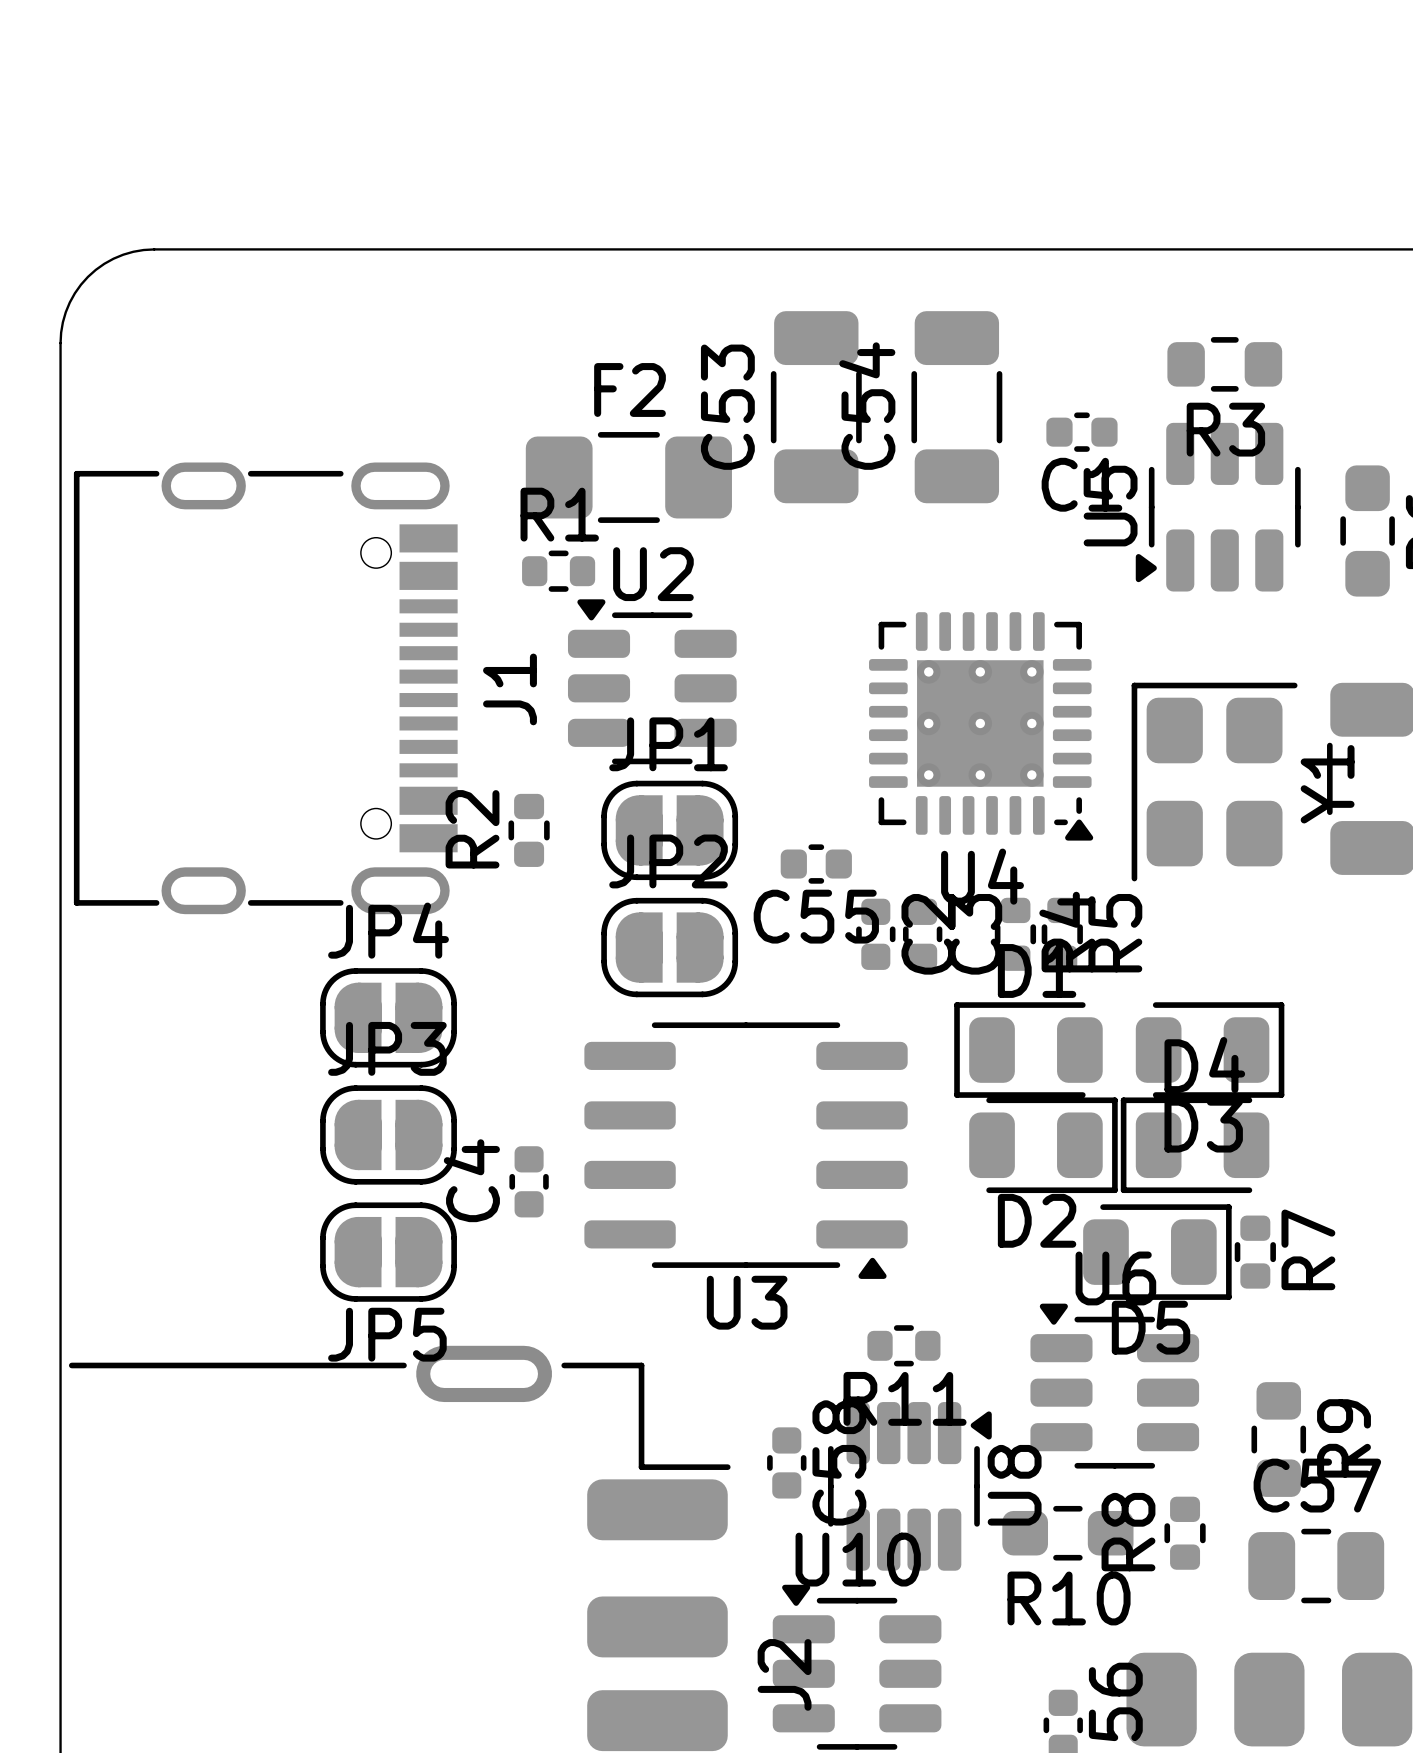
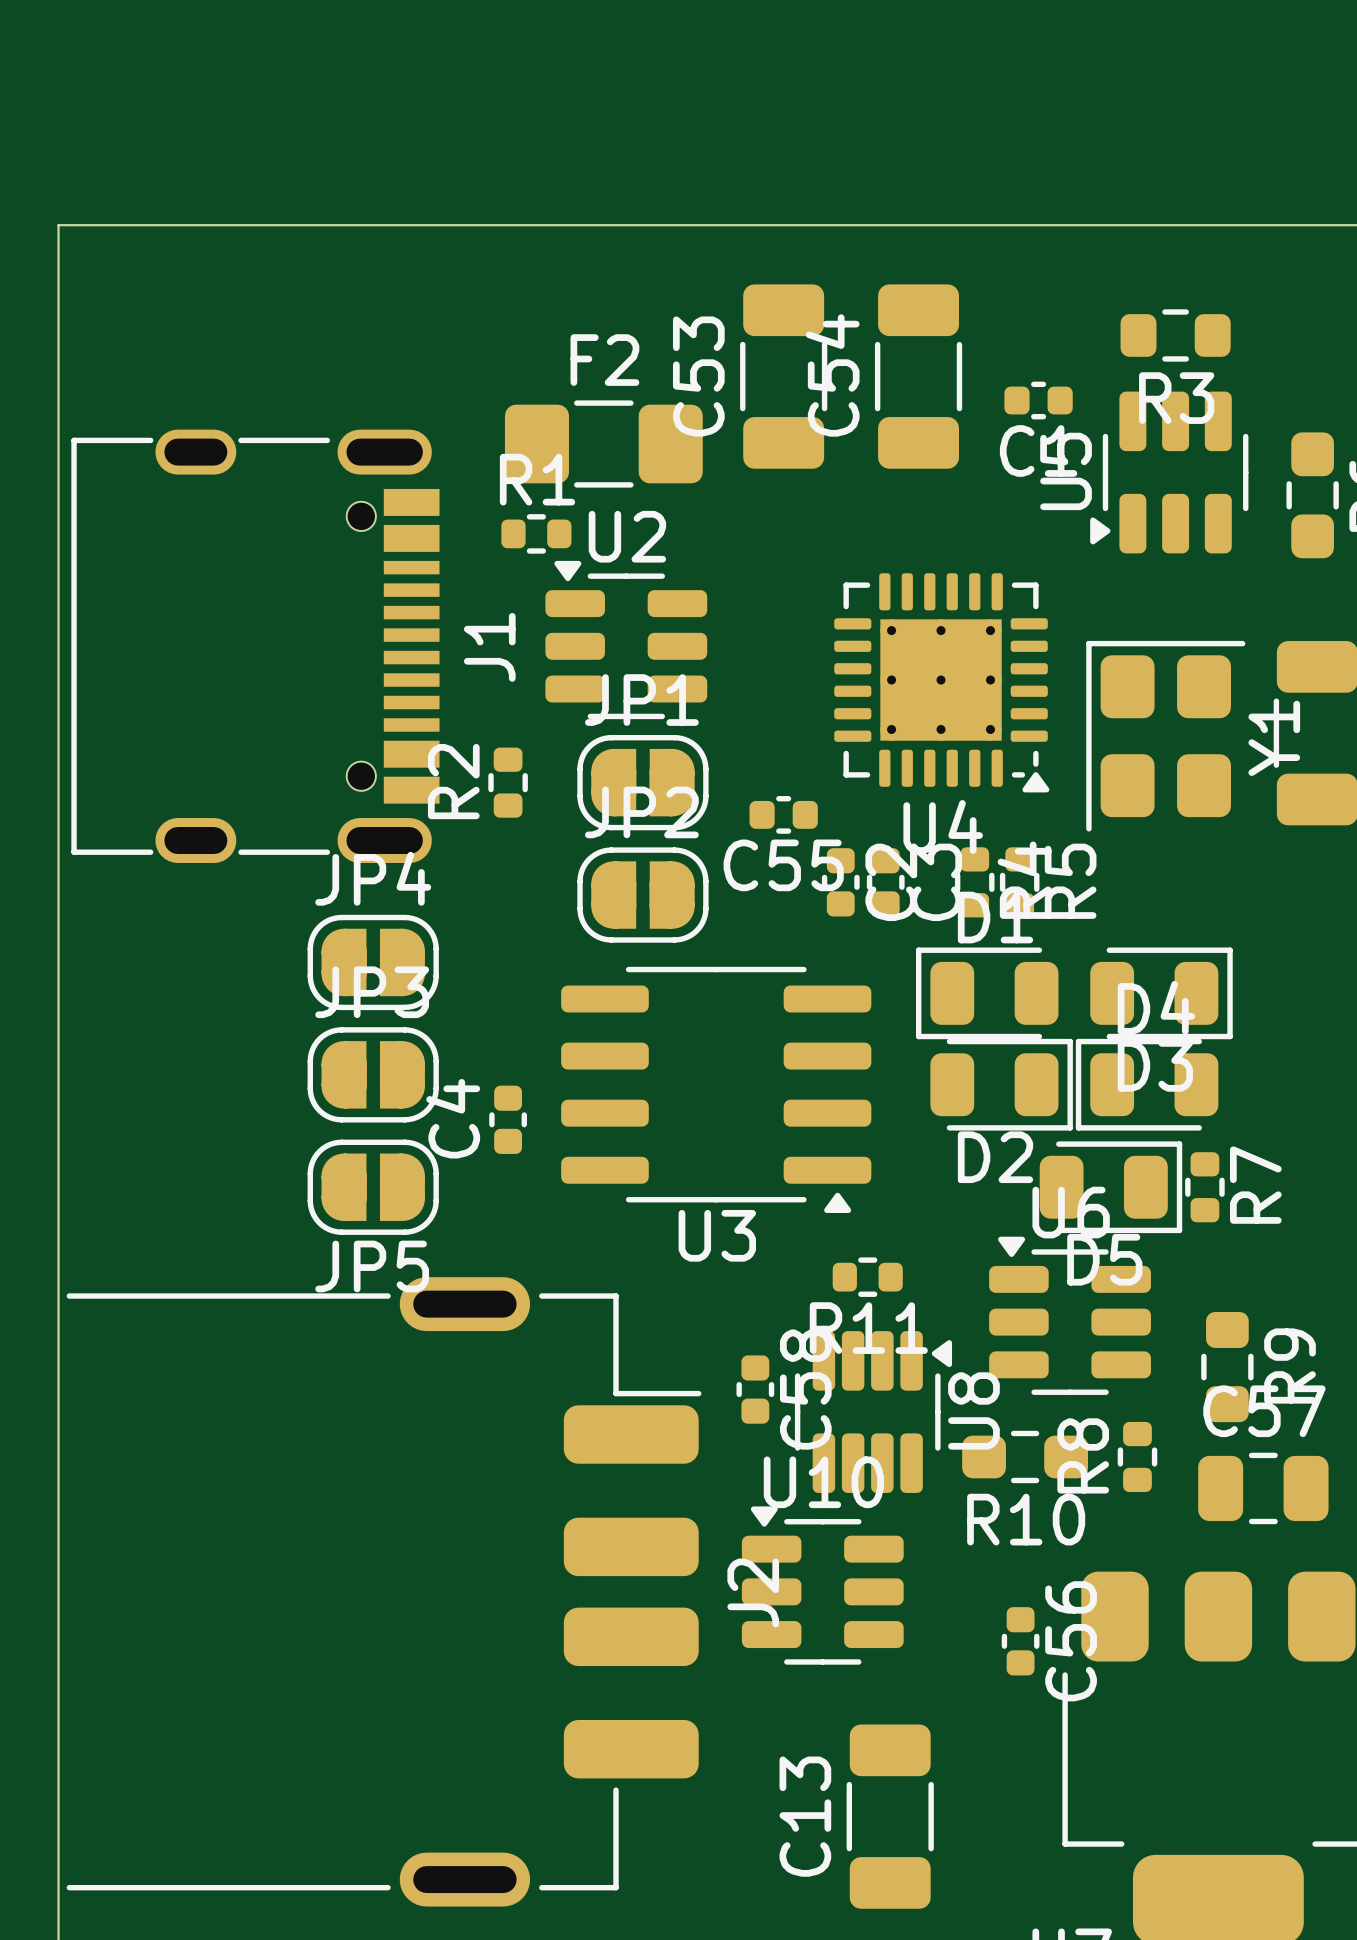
board edge: (154, 249) (133, 251) (113, 258) (87, 276) (69, 302) (62, 322) (60, 343) -> (148, 225) (58, 225) (58, 315)

